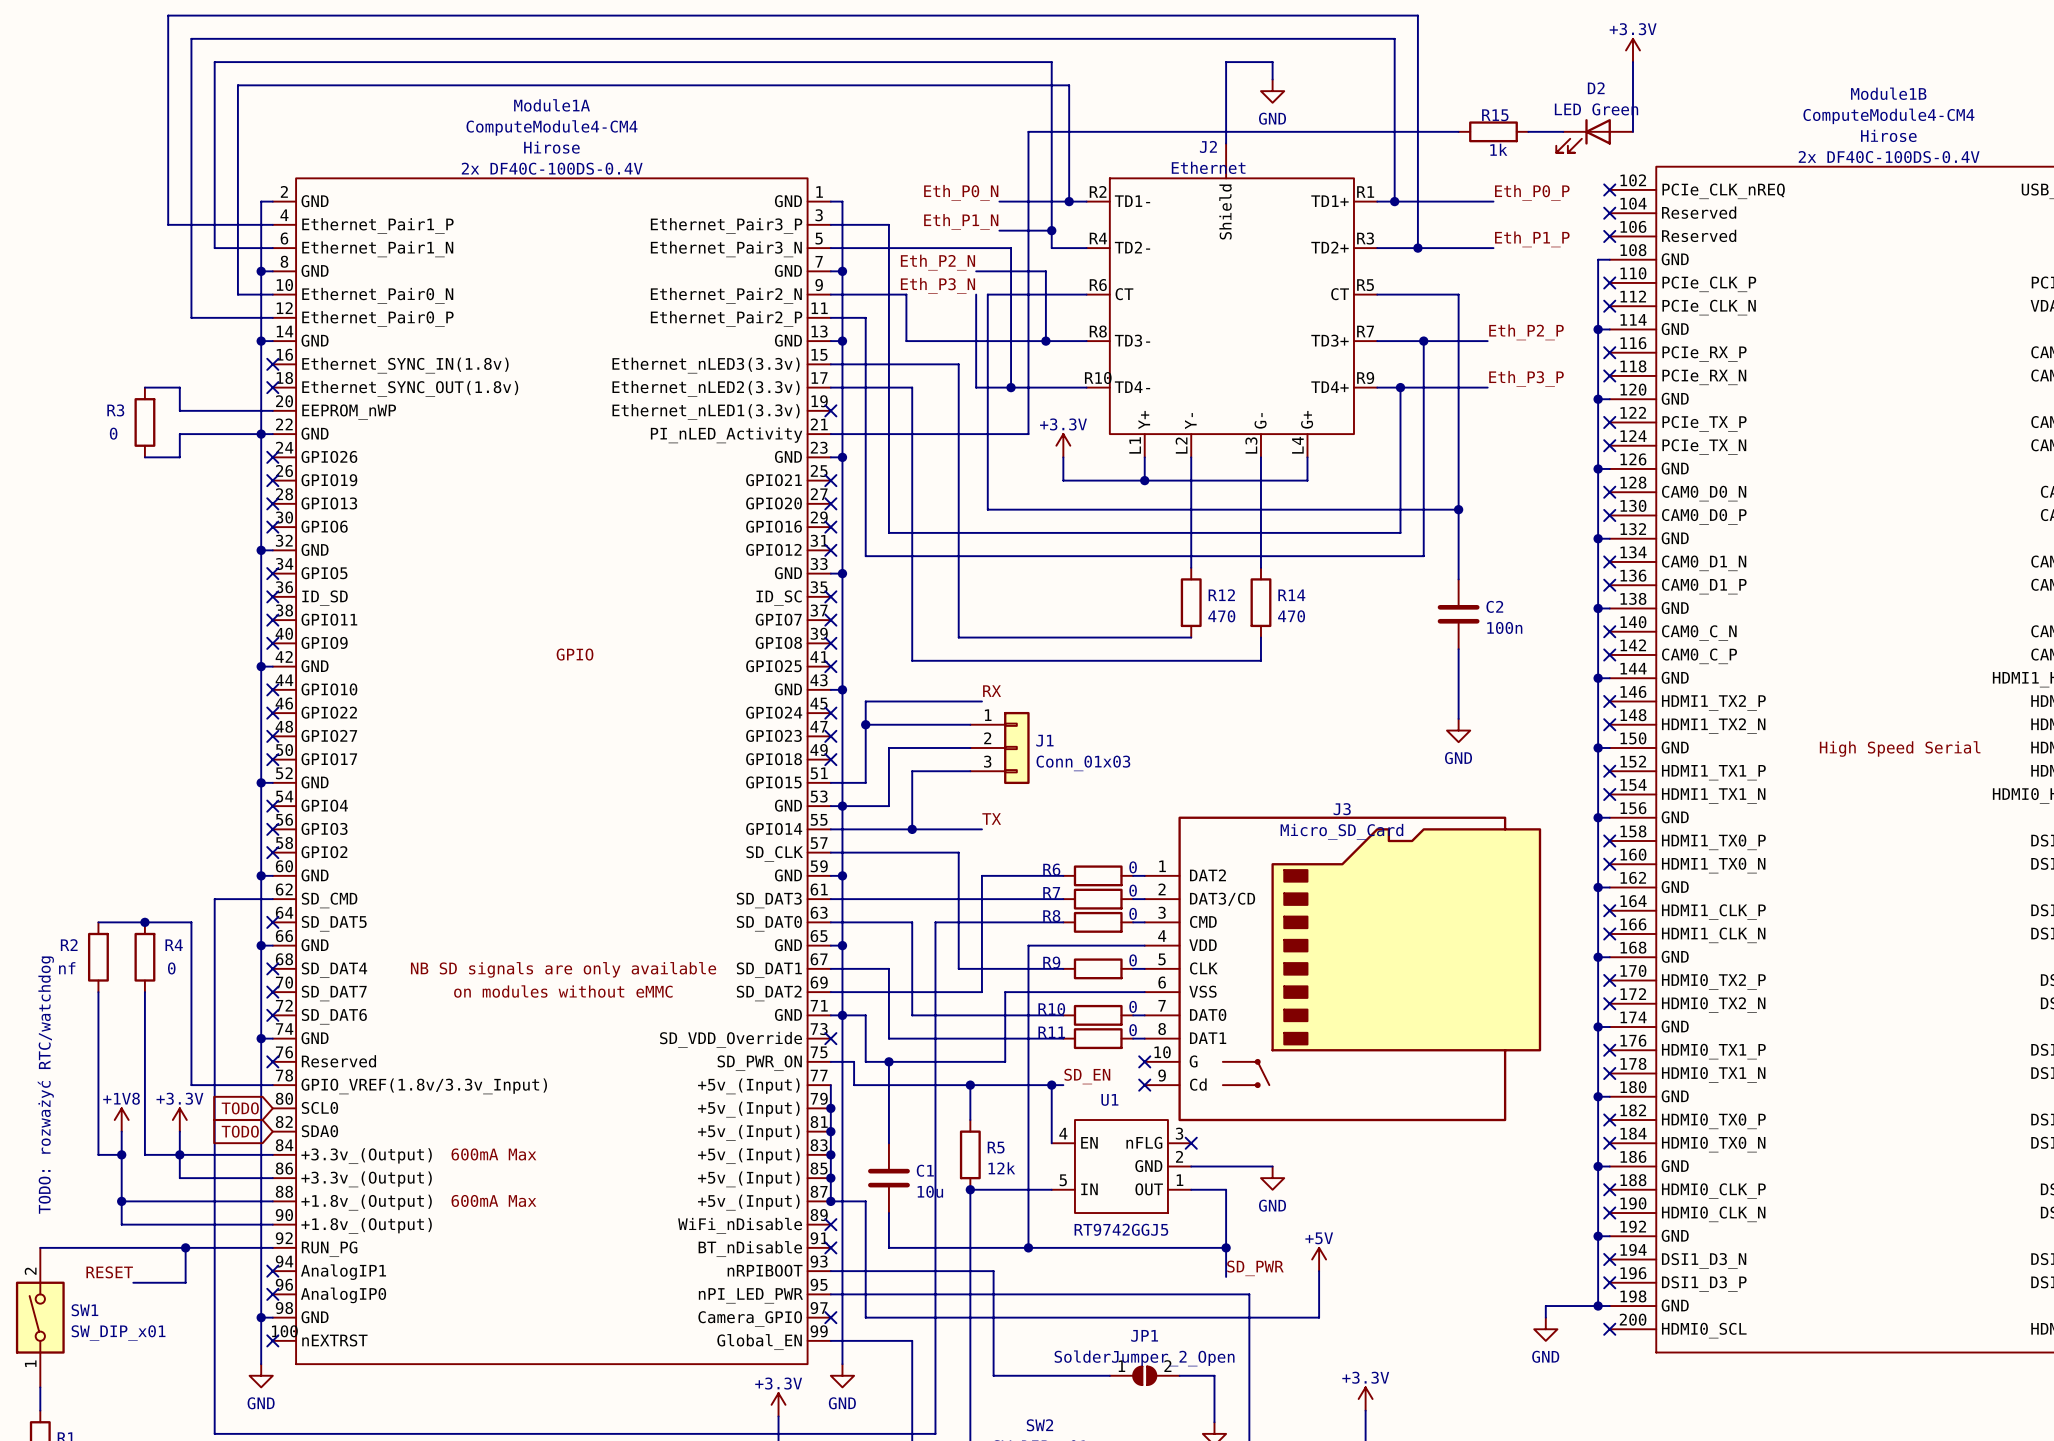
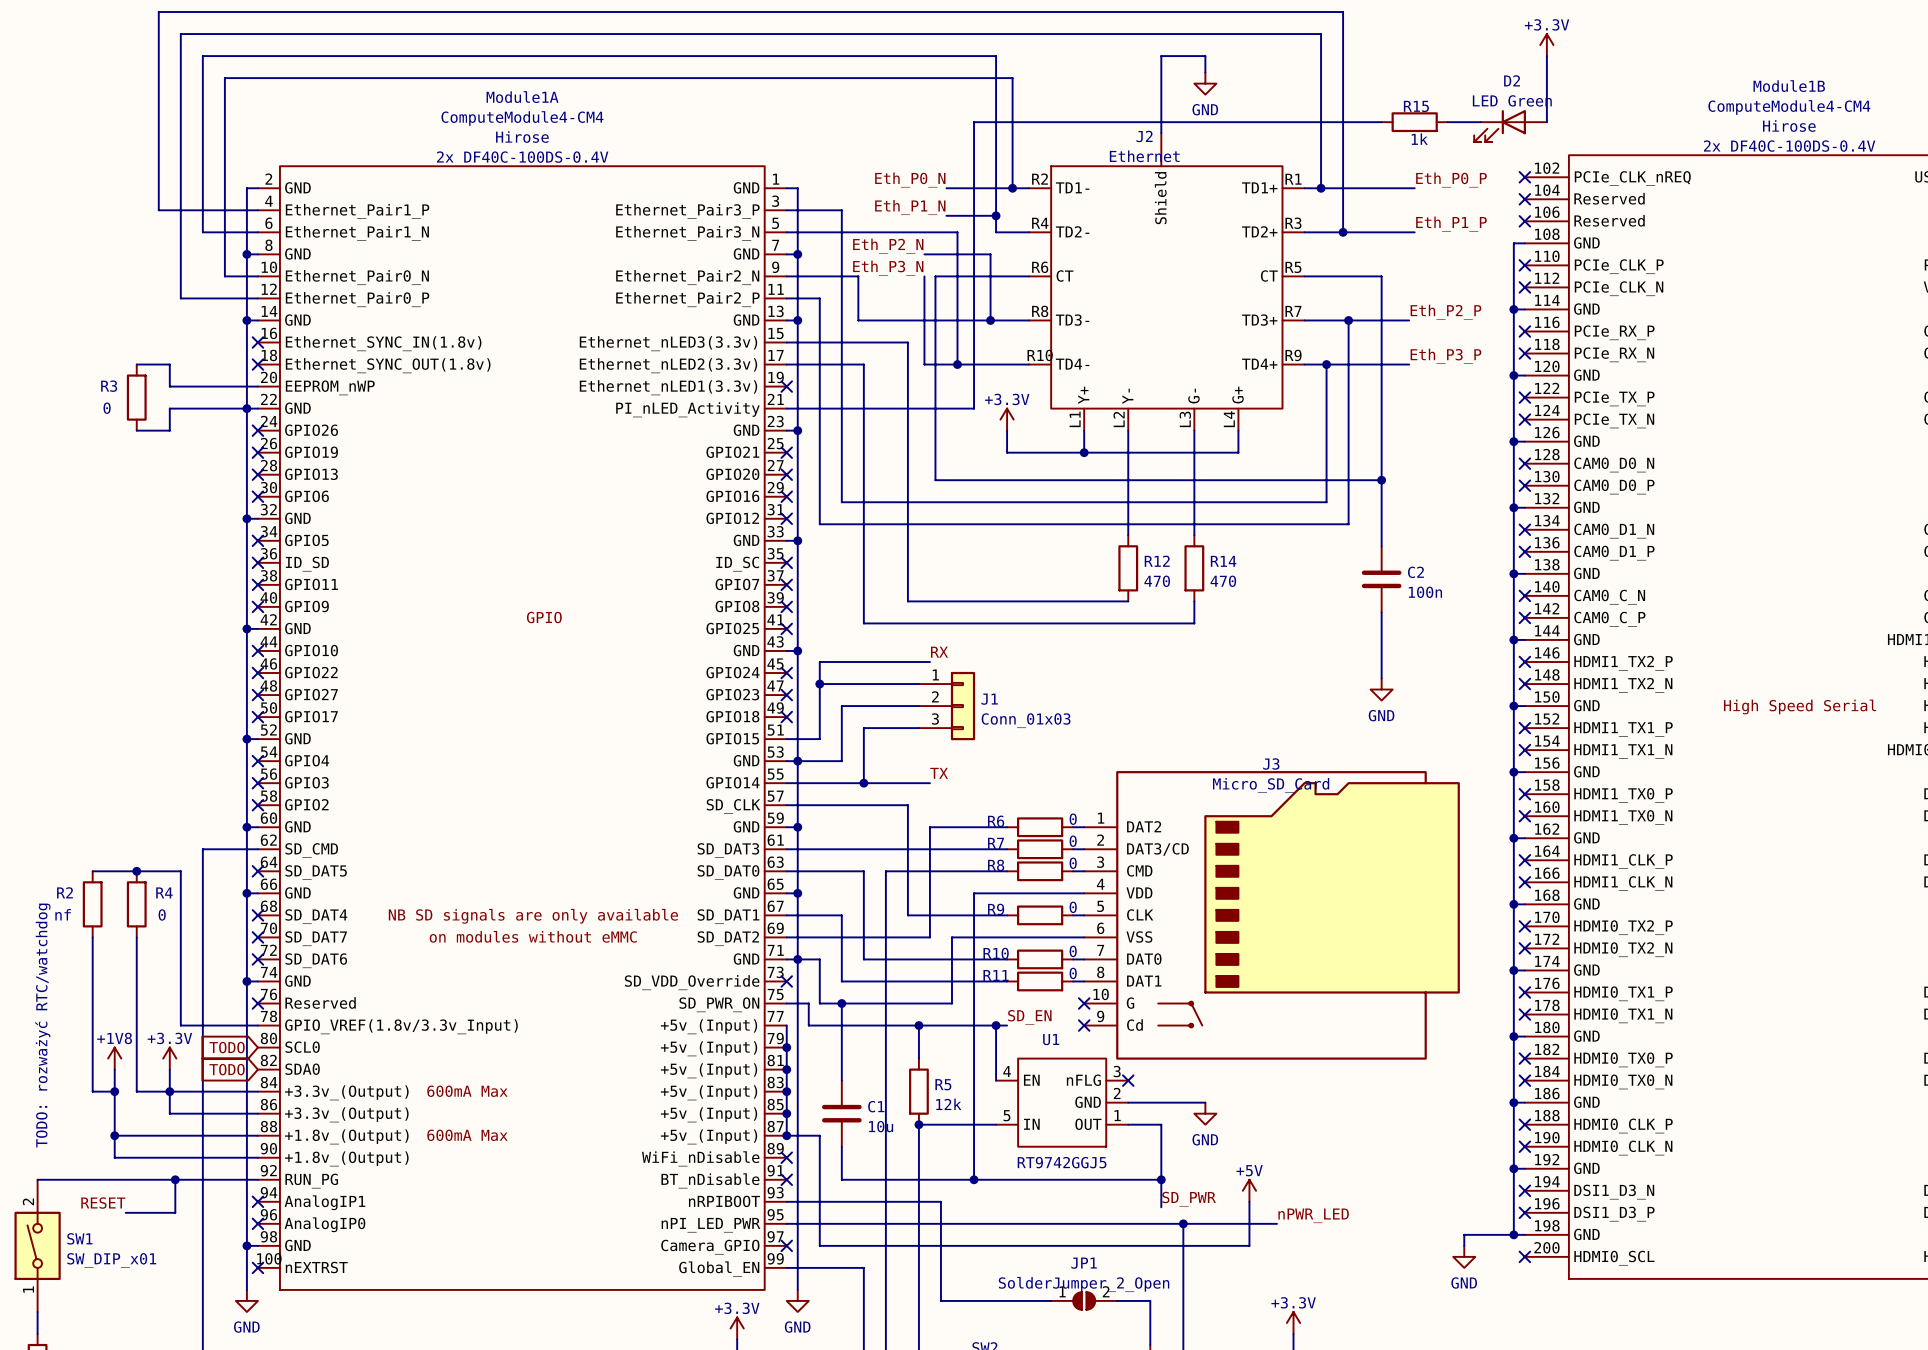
label: none -> nPWR_LED (1313, 1215)
wire: none -> (1183, 1223) (1276, 1223)
junction: none -> (1183, 1223)

